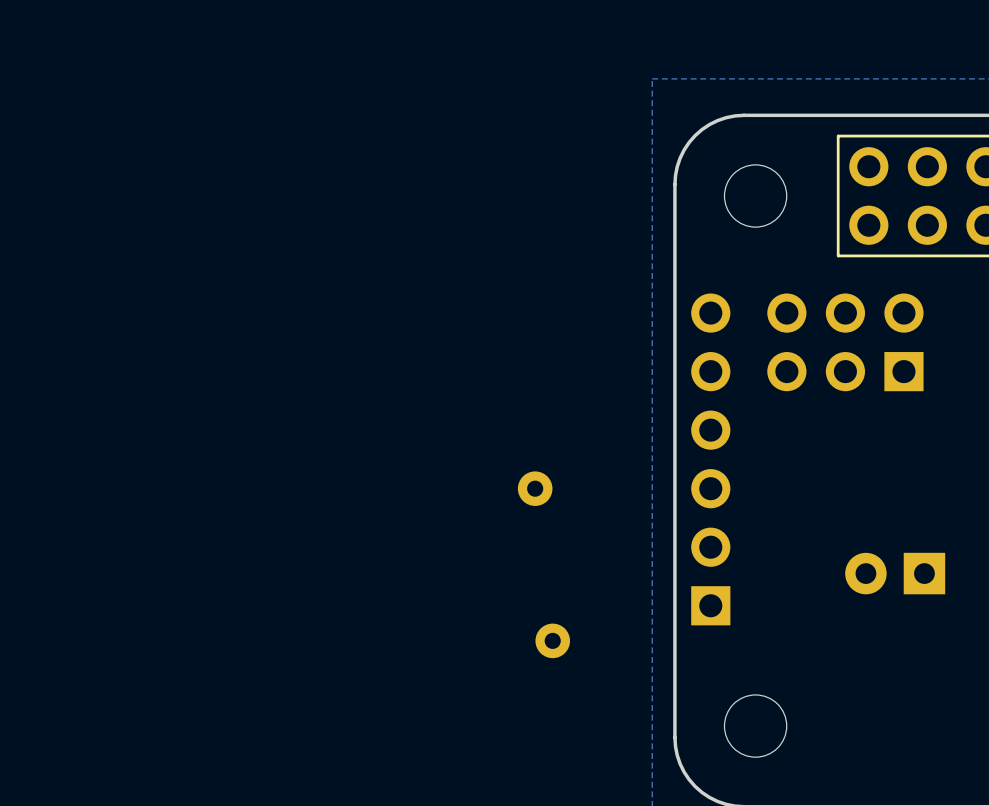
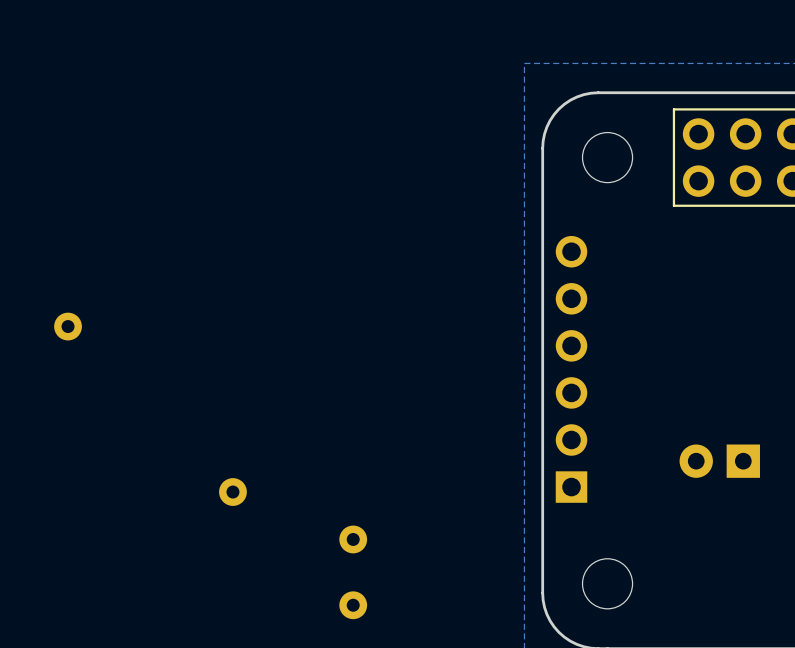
part: (845, 342) -> none
part: none -> (68, 326)
part: (535, 488) -> none
part: none -> (232, 492)
part: (552, 640) -> none
part: none -> (353, 539)
part: none -> (353, 605)

